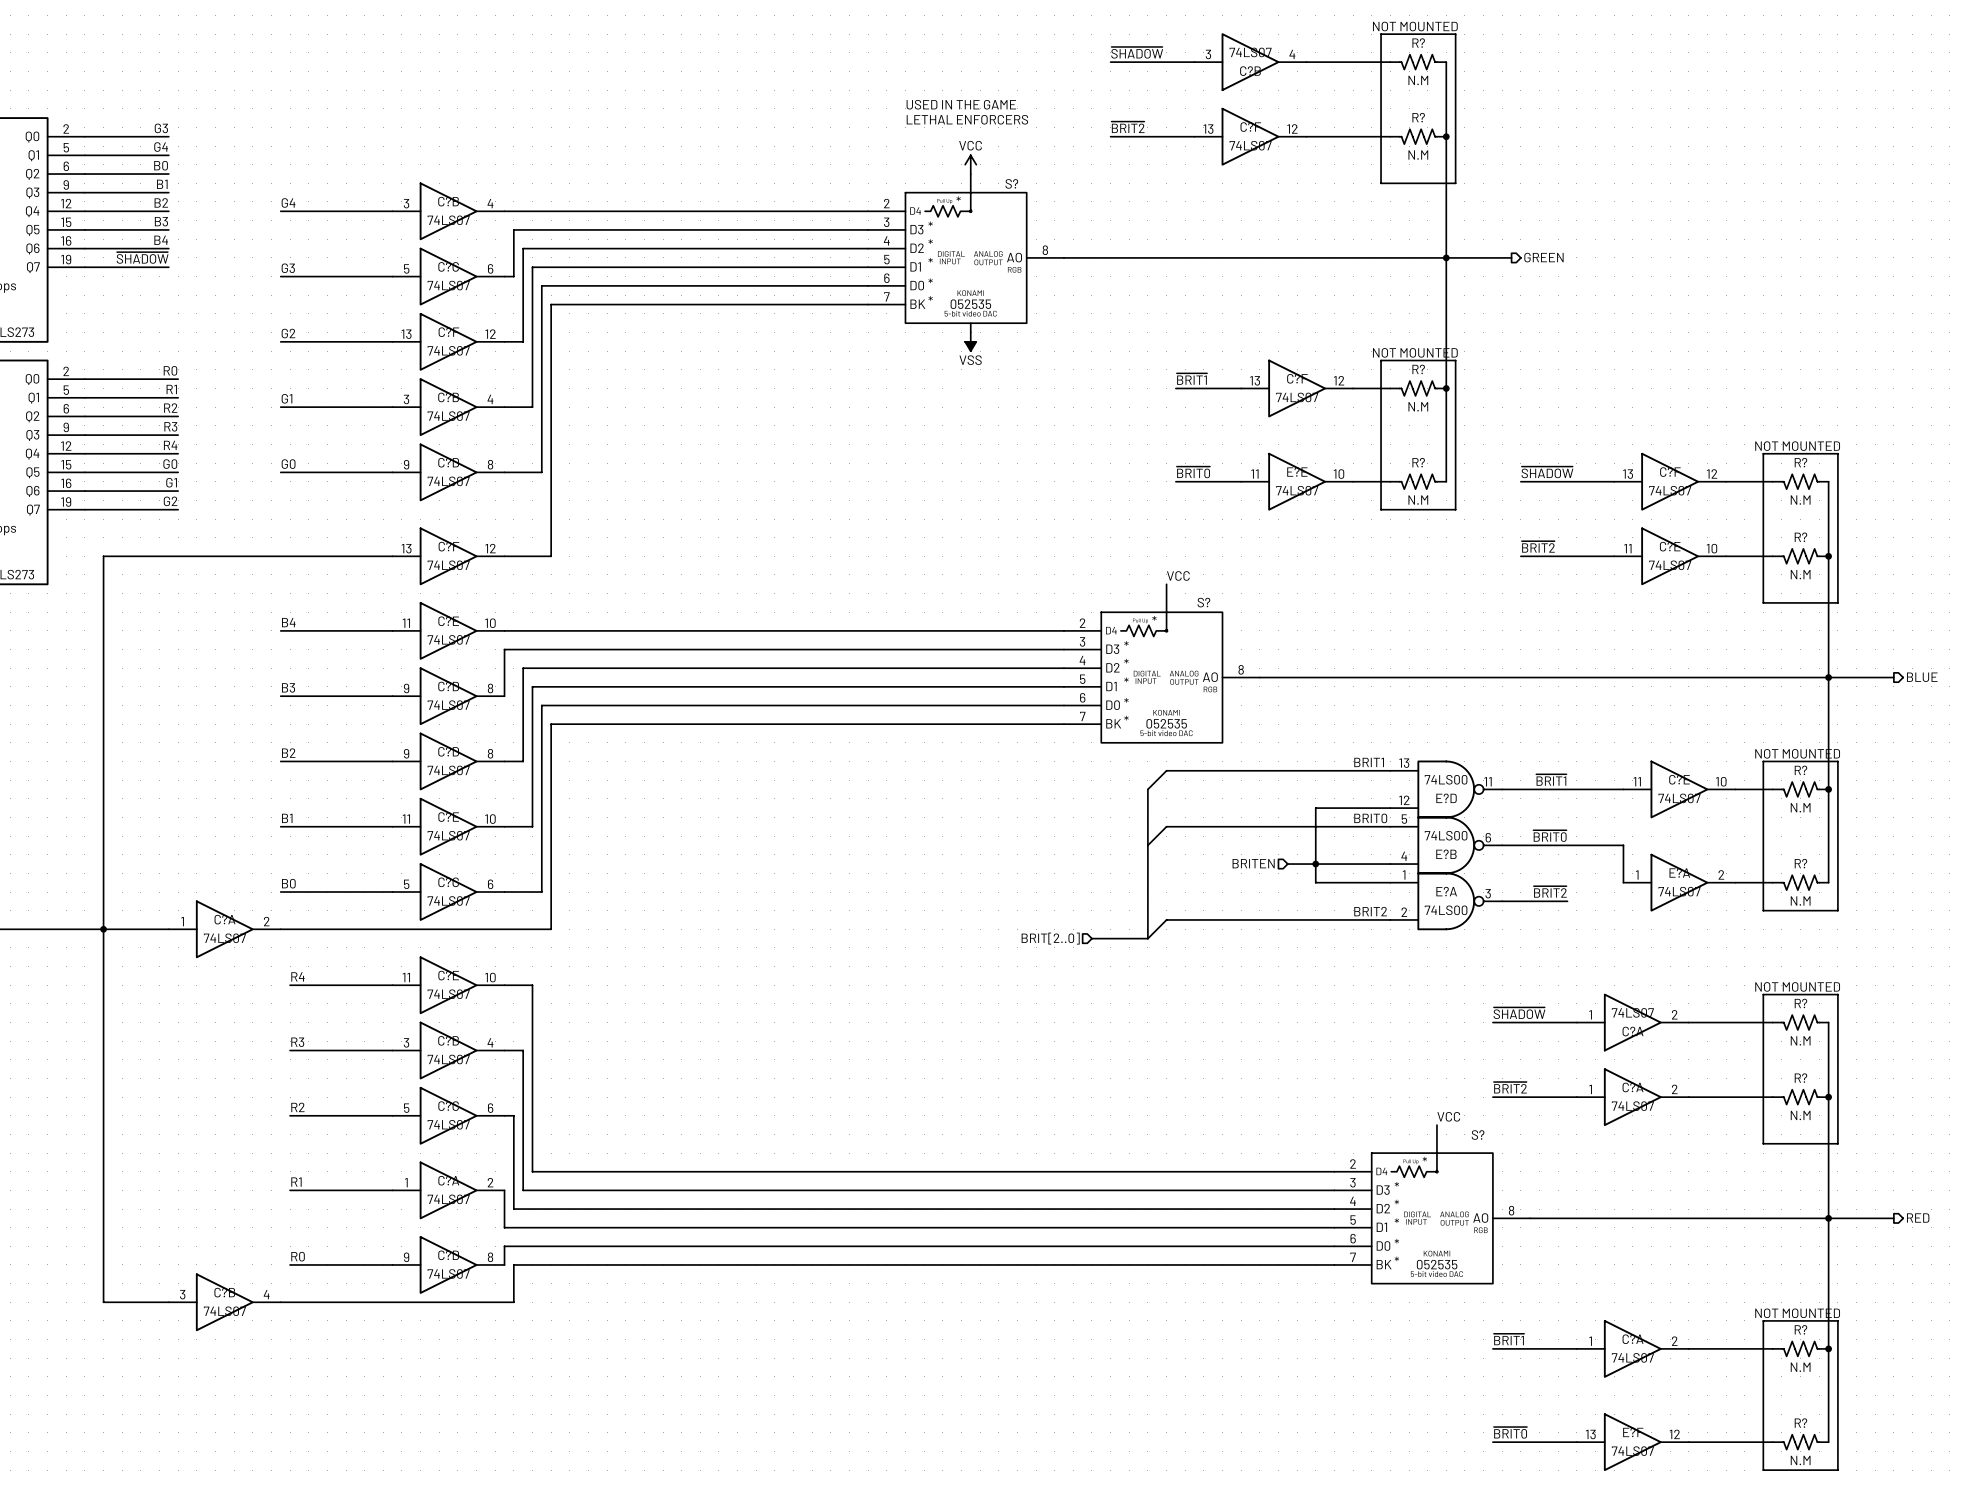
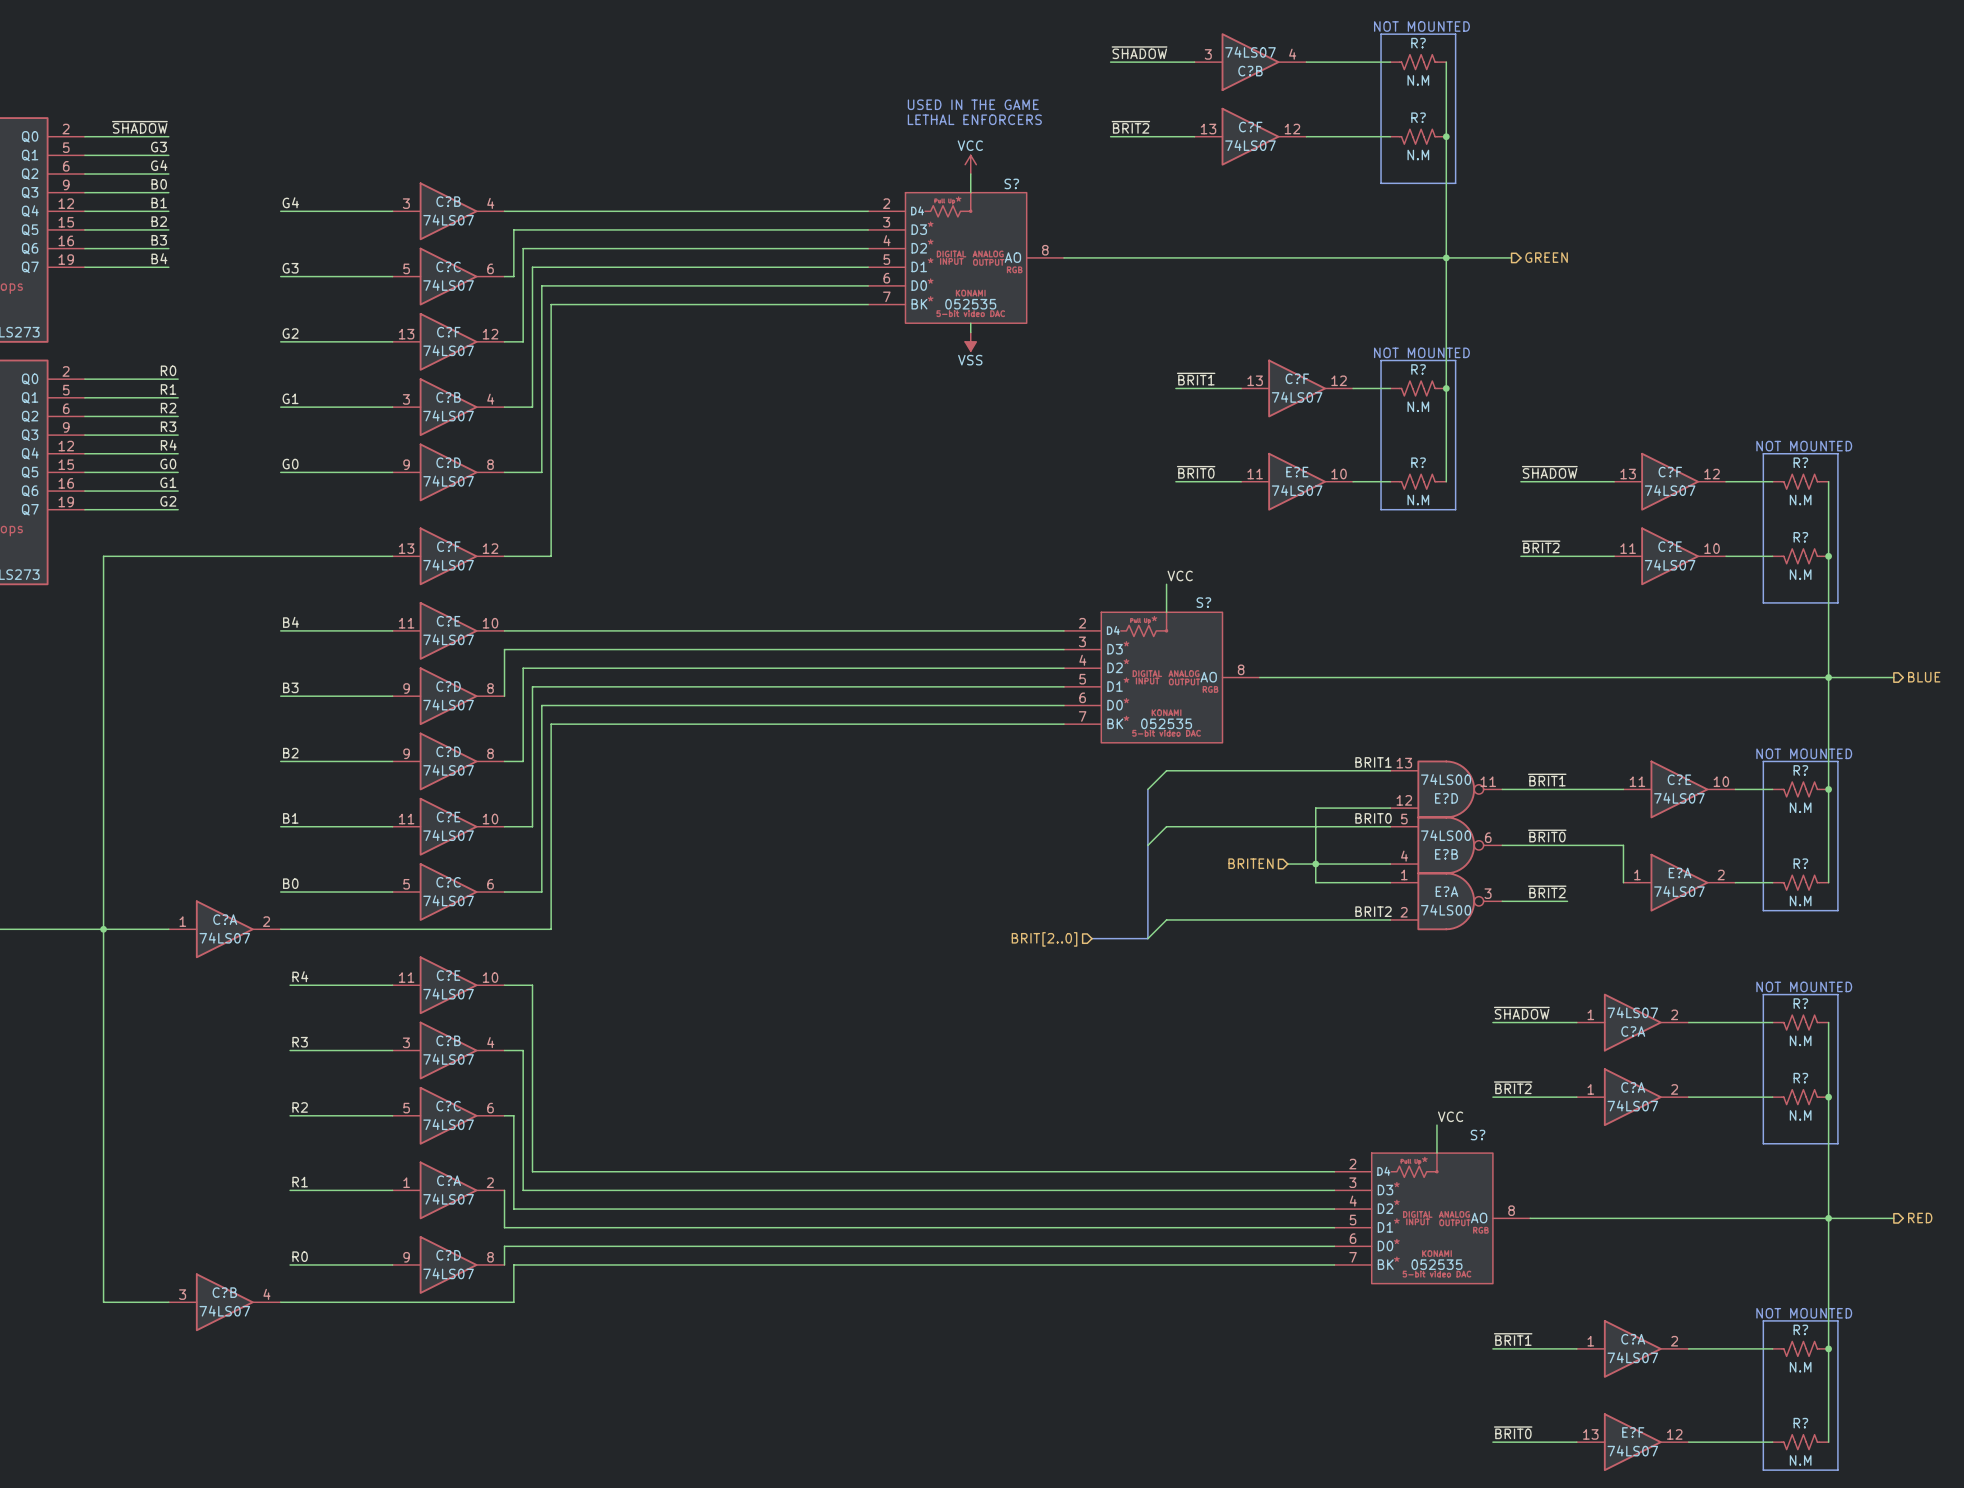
label: G3 (161, 128) -> ~{SHADOW} (139, 127)
label: G4 (161, 147) -> G3 (158, 147)
label: B0 (161, 165) -> G4 (159, 165)
label: B1 (162, 184) -> B0 (159, 184)
label: B2 (161, 202) -> B1 (159, 202)
label: B3 (161, 221) -> B2 (159, 221)
label: B4 (161, 240) -> B3 (159, 240)
label: ~{SHADOW} (142, 257) -> B4 (159, 258)

